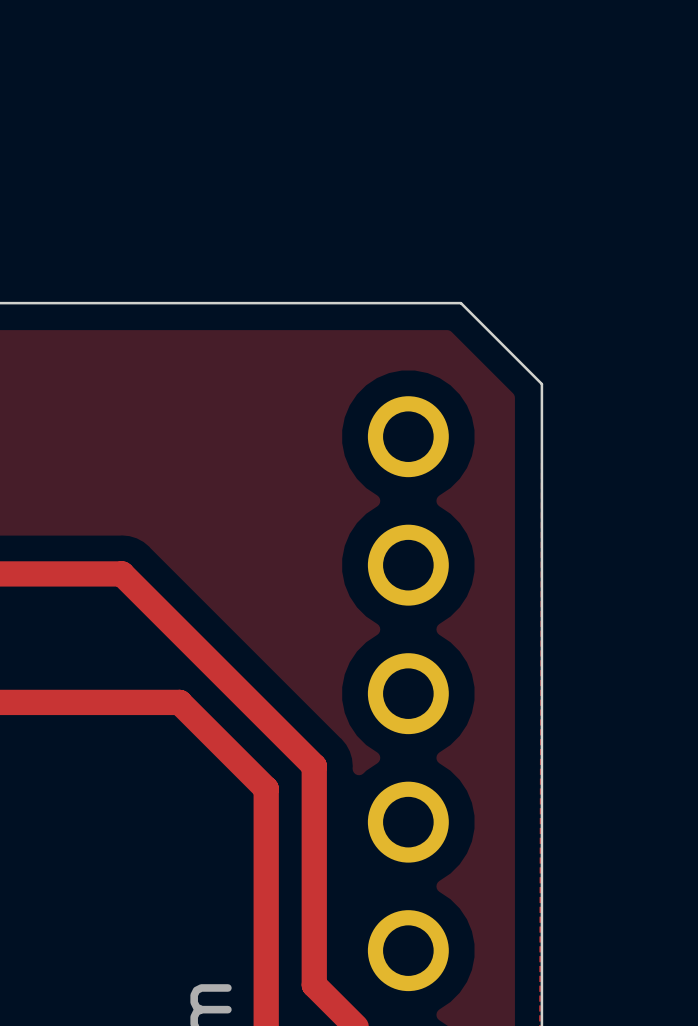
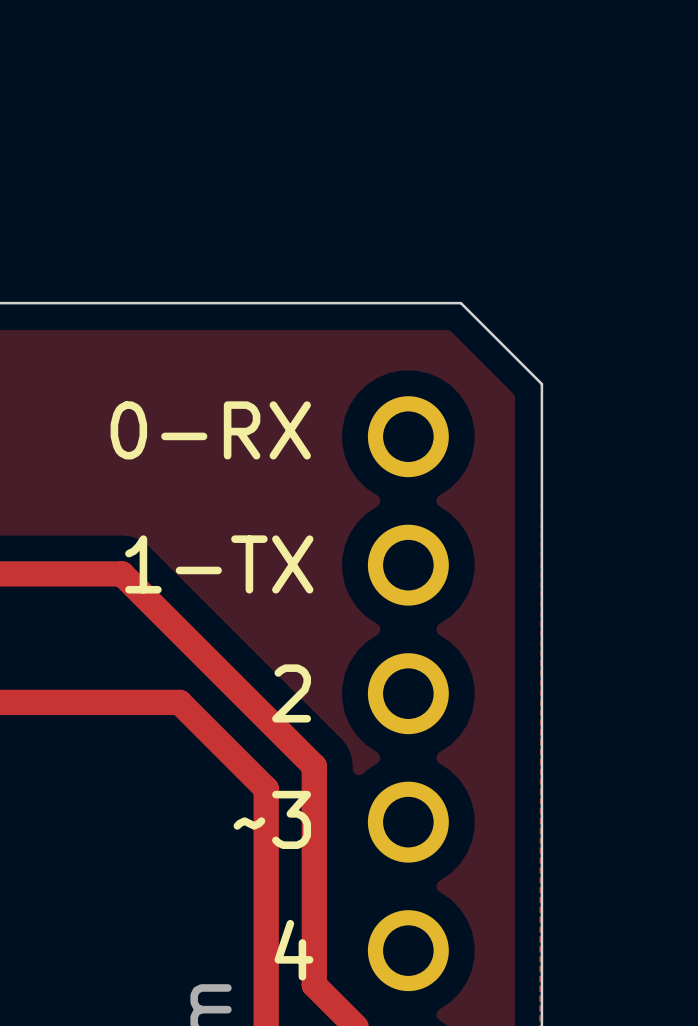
text: none -> 0-RX (210, 430)
text: none -> 1-TX (219, 564)
text: none -> 2 (291, 693)
text: none -> ~3 (272, 819)
text: none -> 4 (293, 950)

